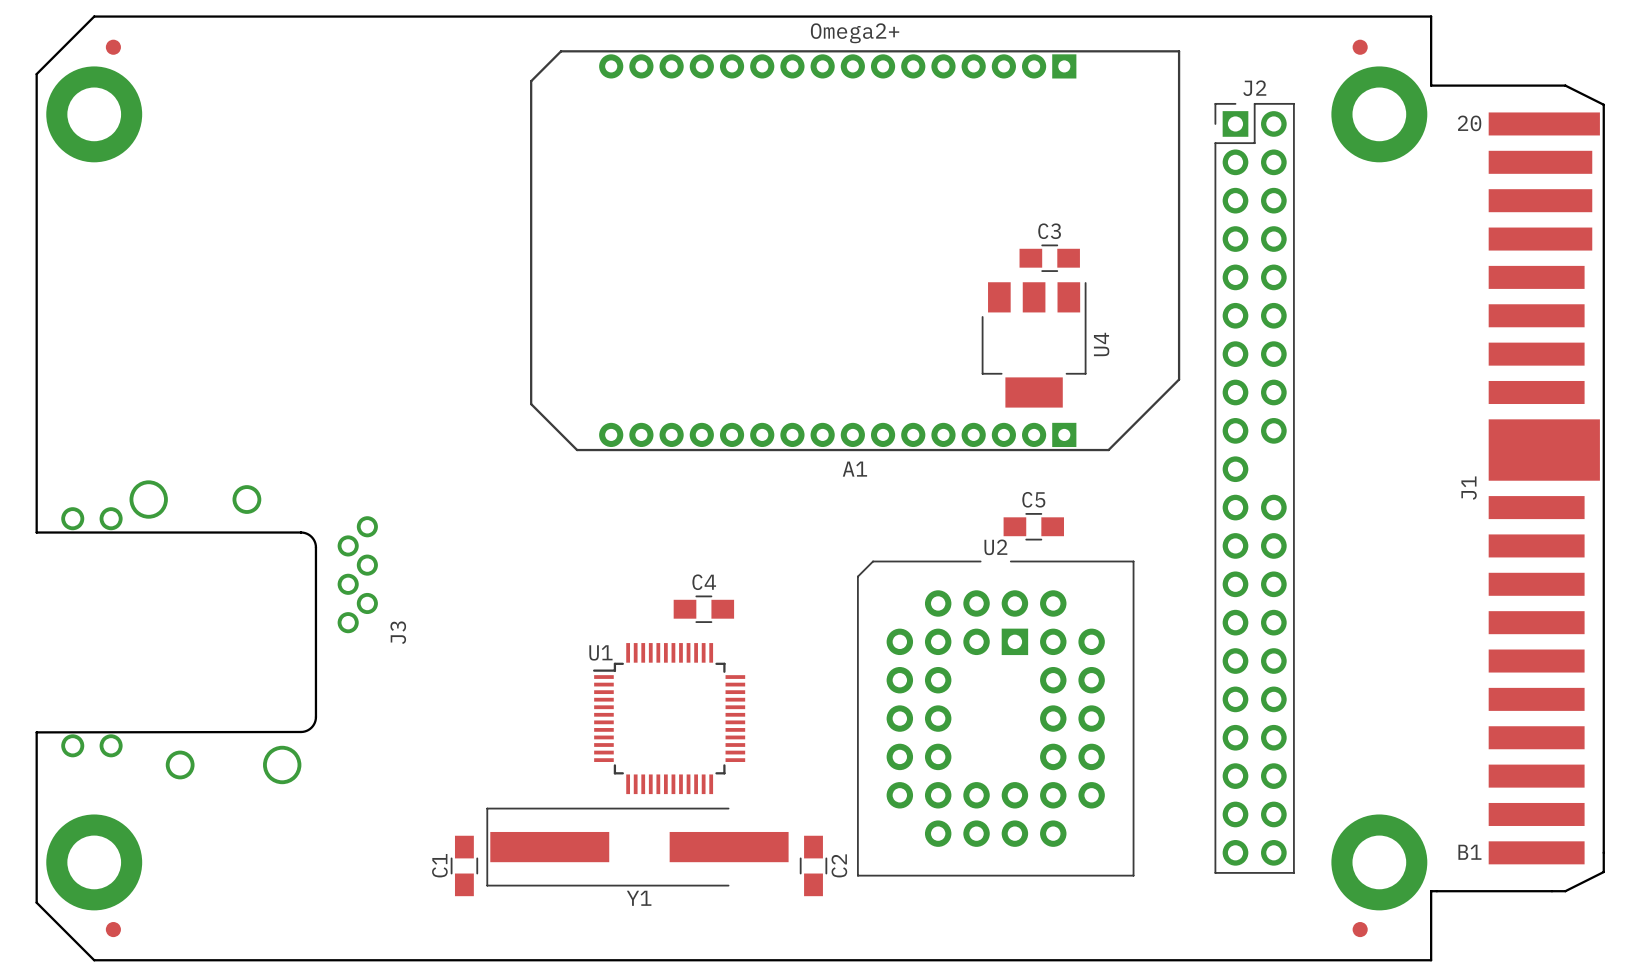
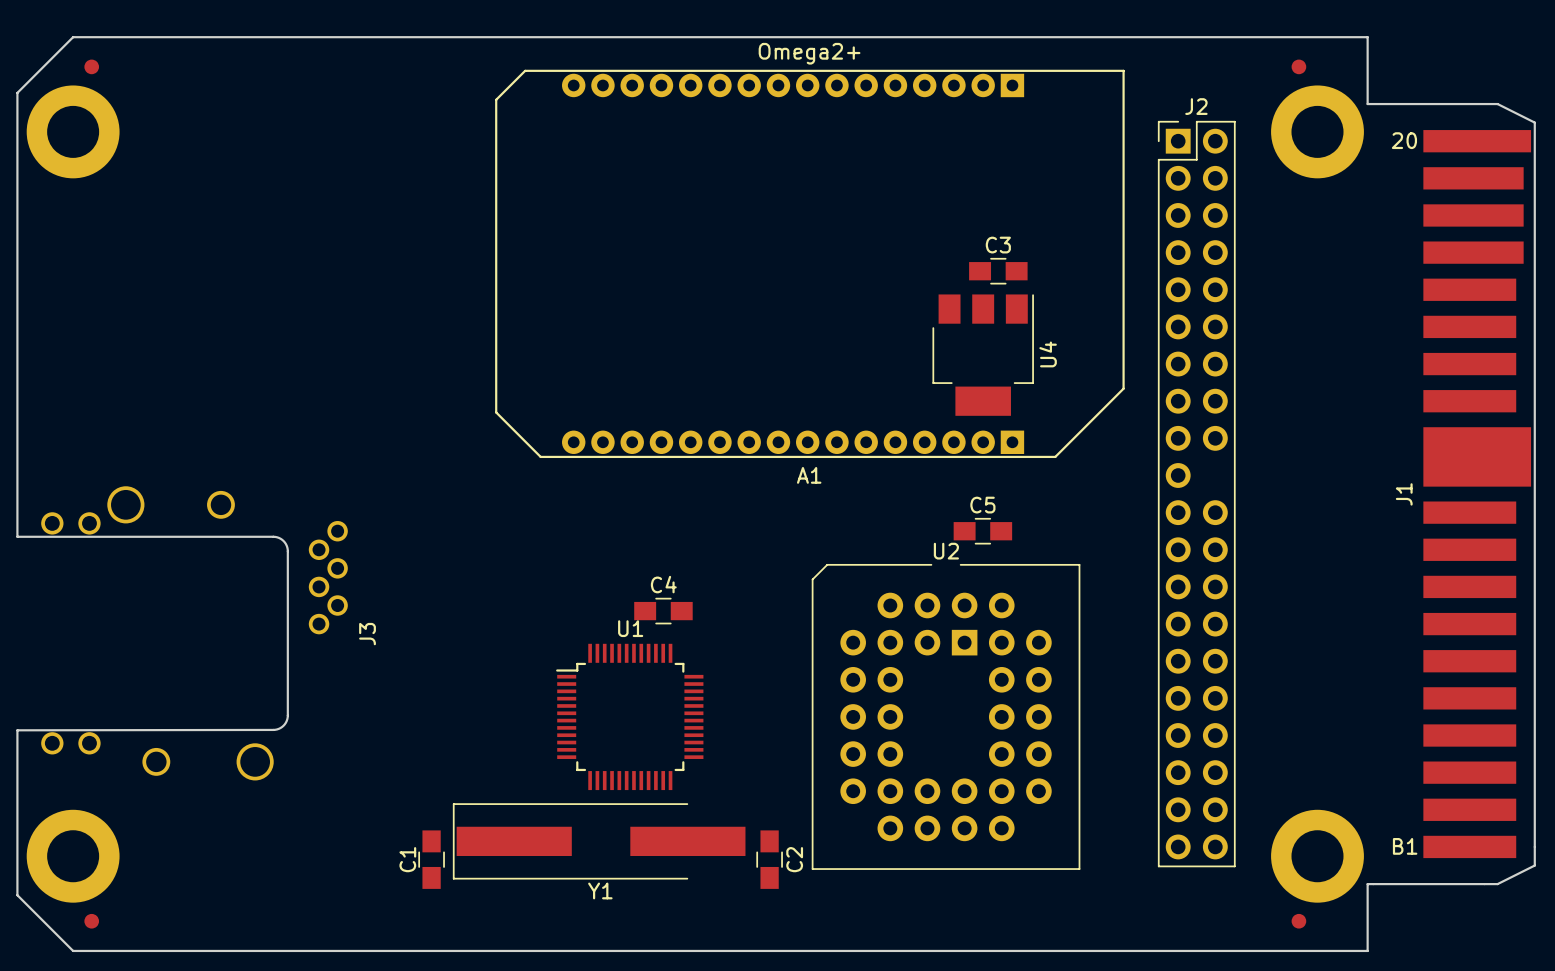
U1 name position: U1 (600, 652) -> U1 (630, 628)

